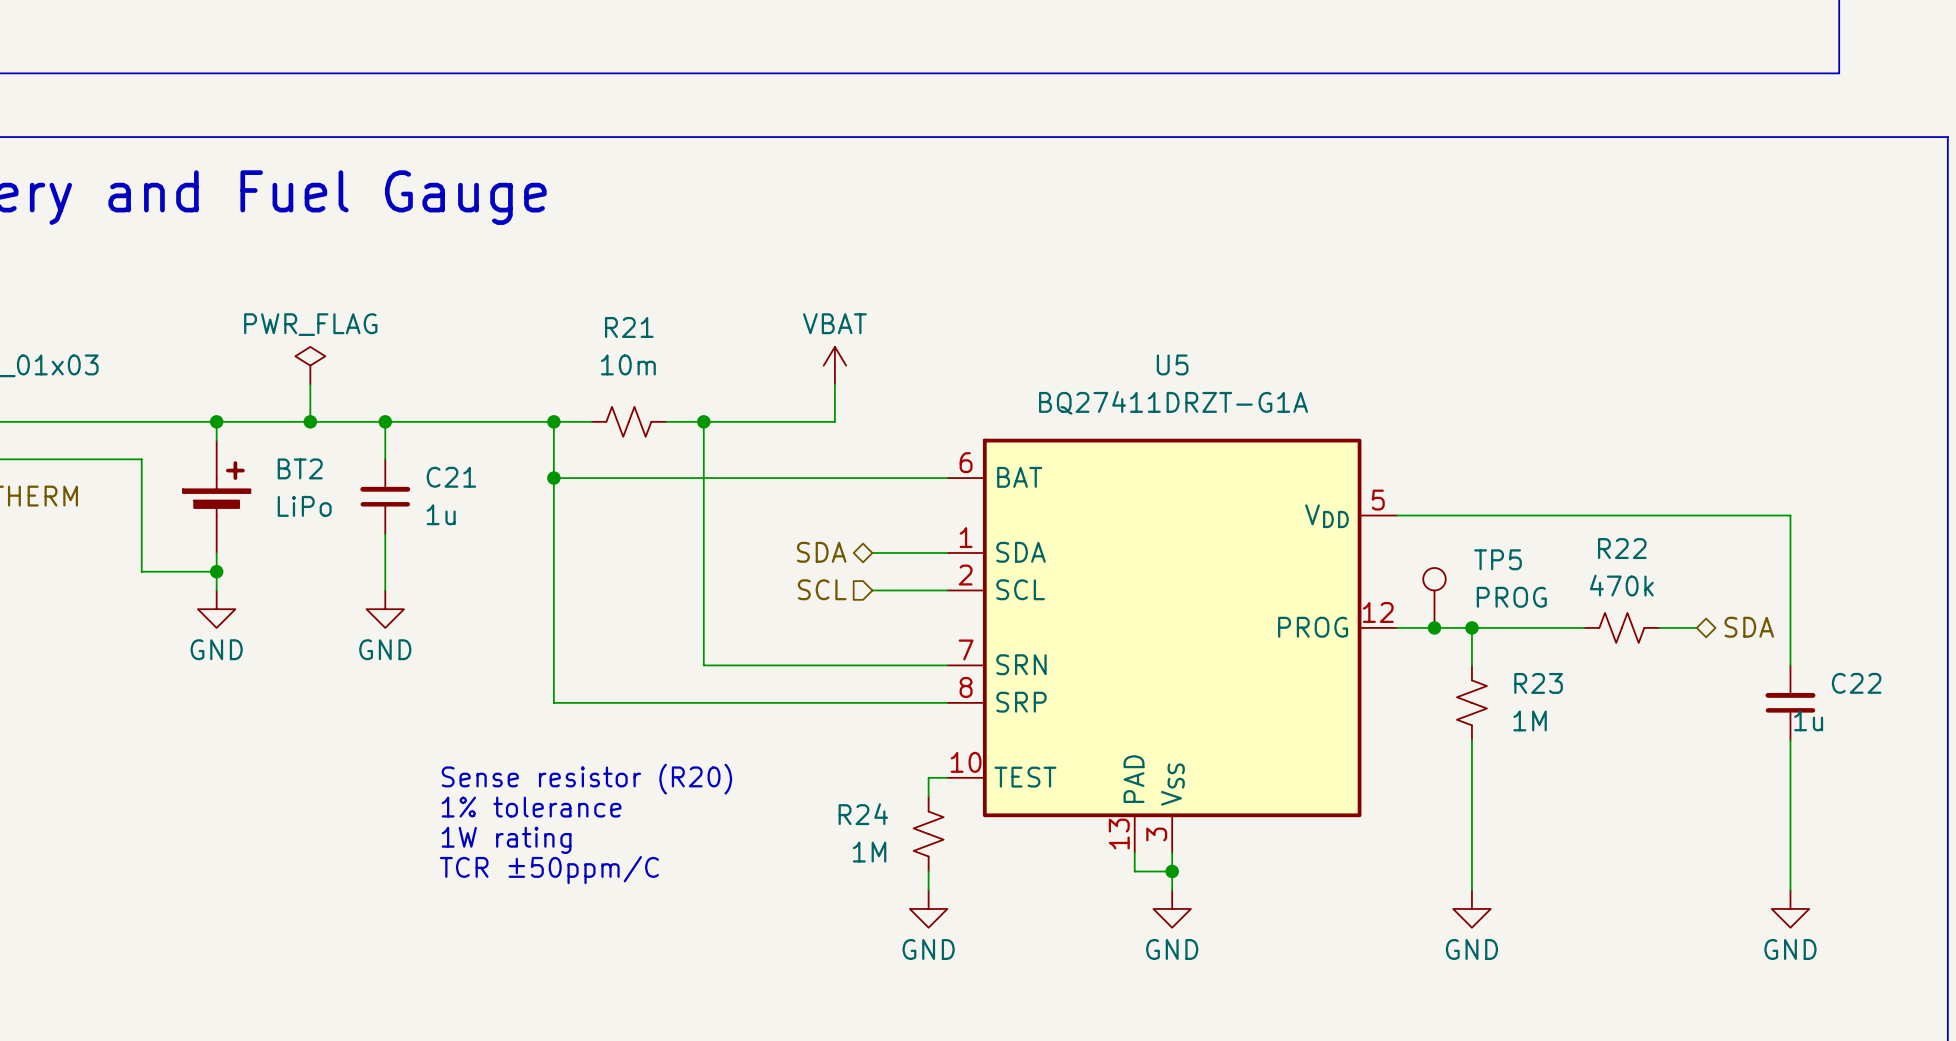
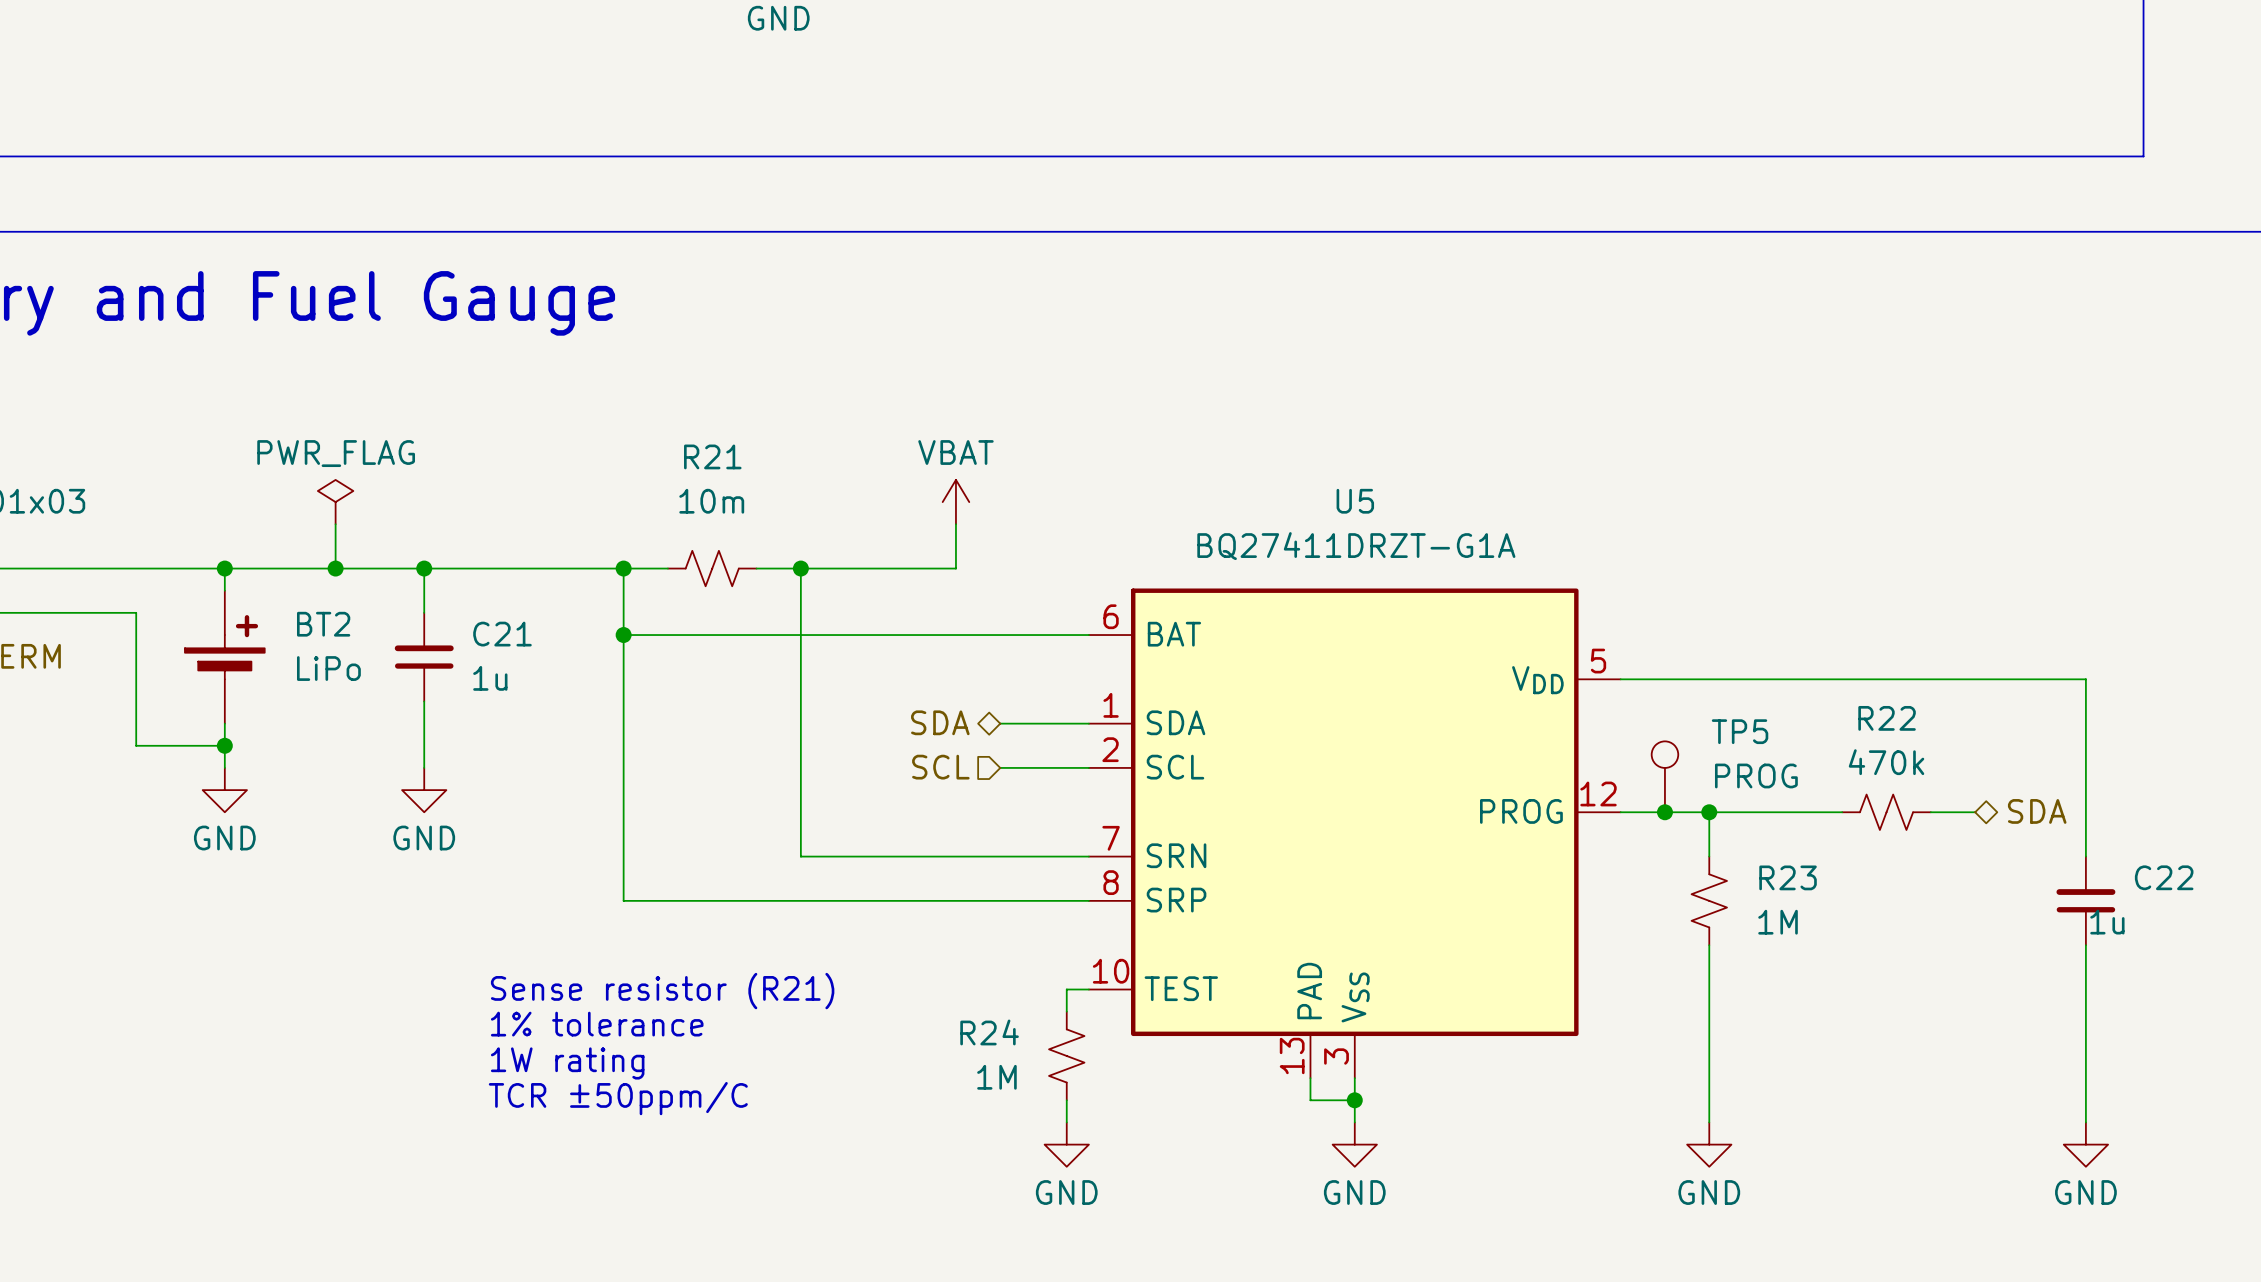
text: Sense resistor (R20) (586, 779) -> Sense resistor (R21) (662, 991)

